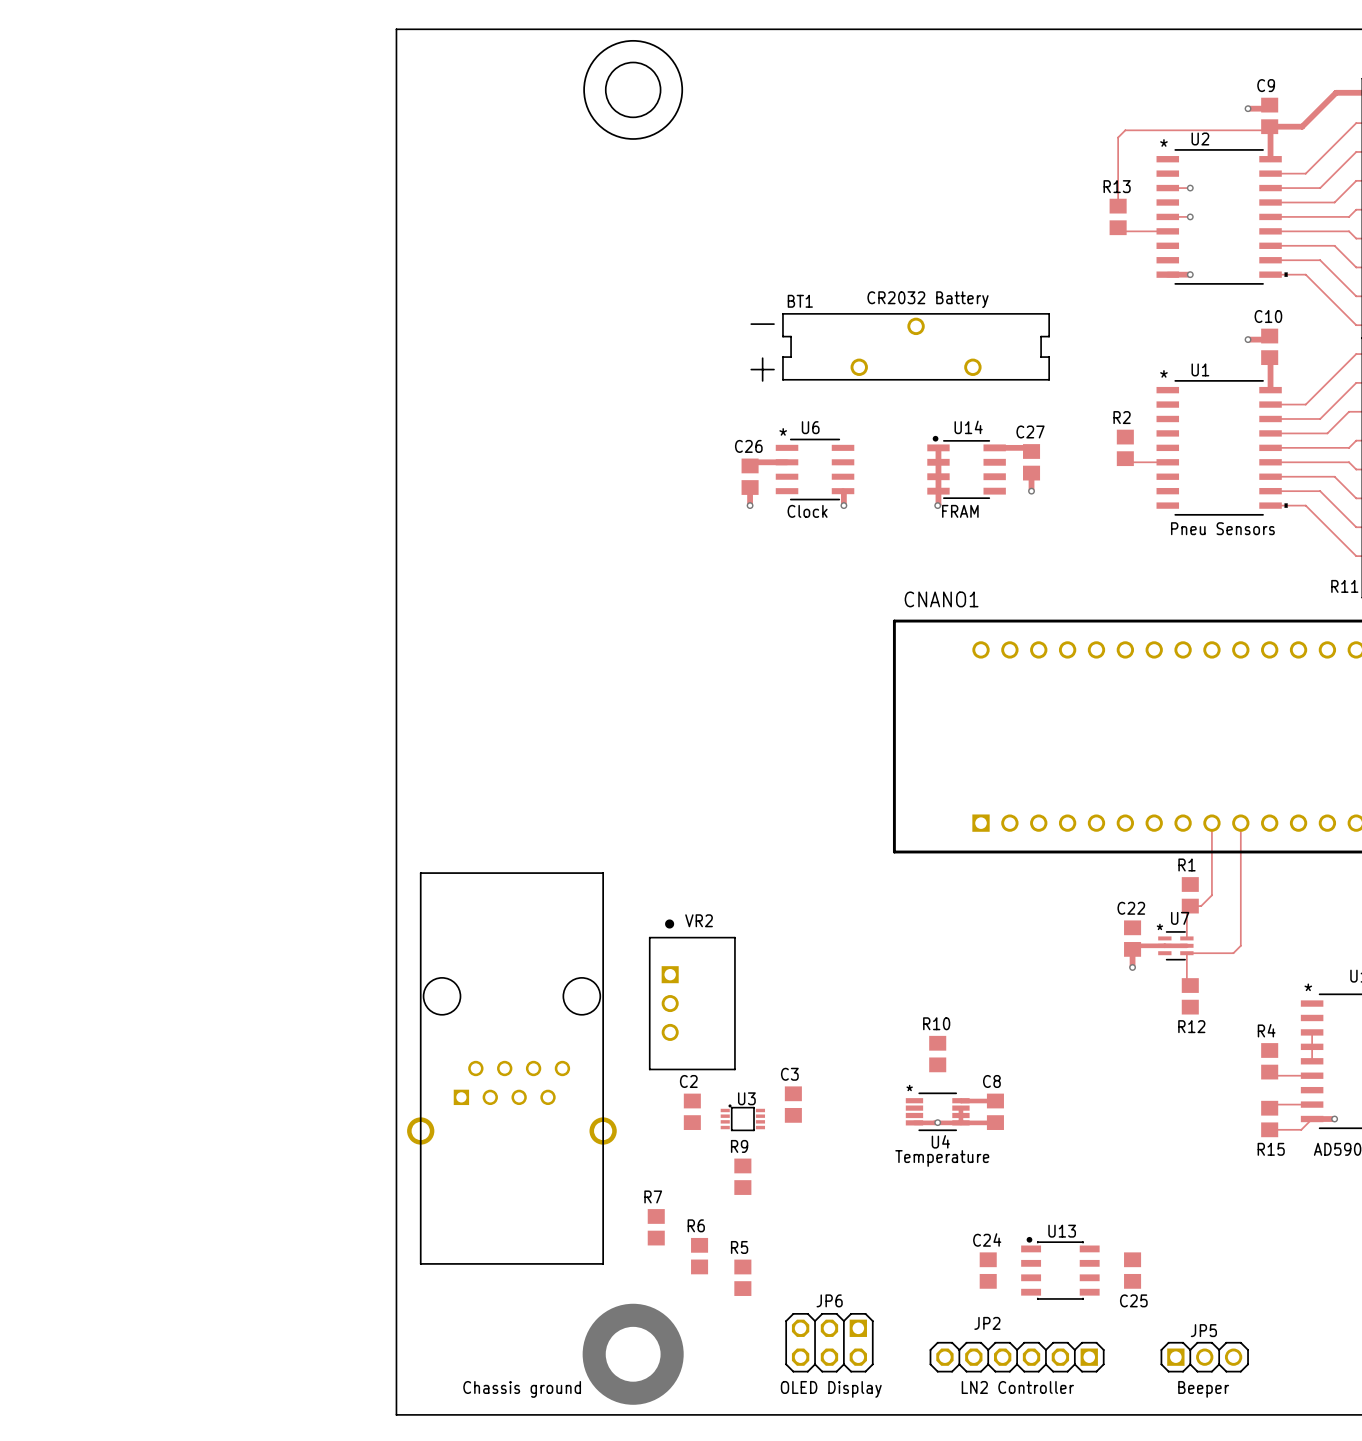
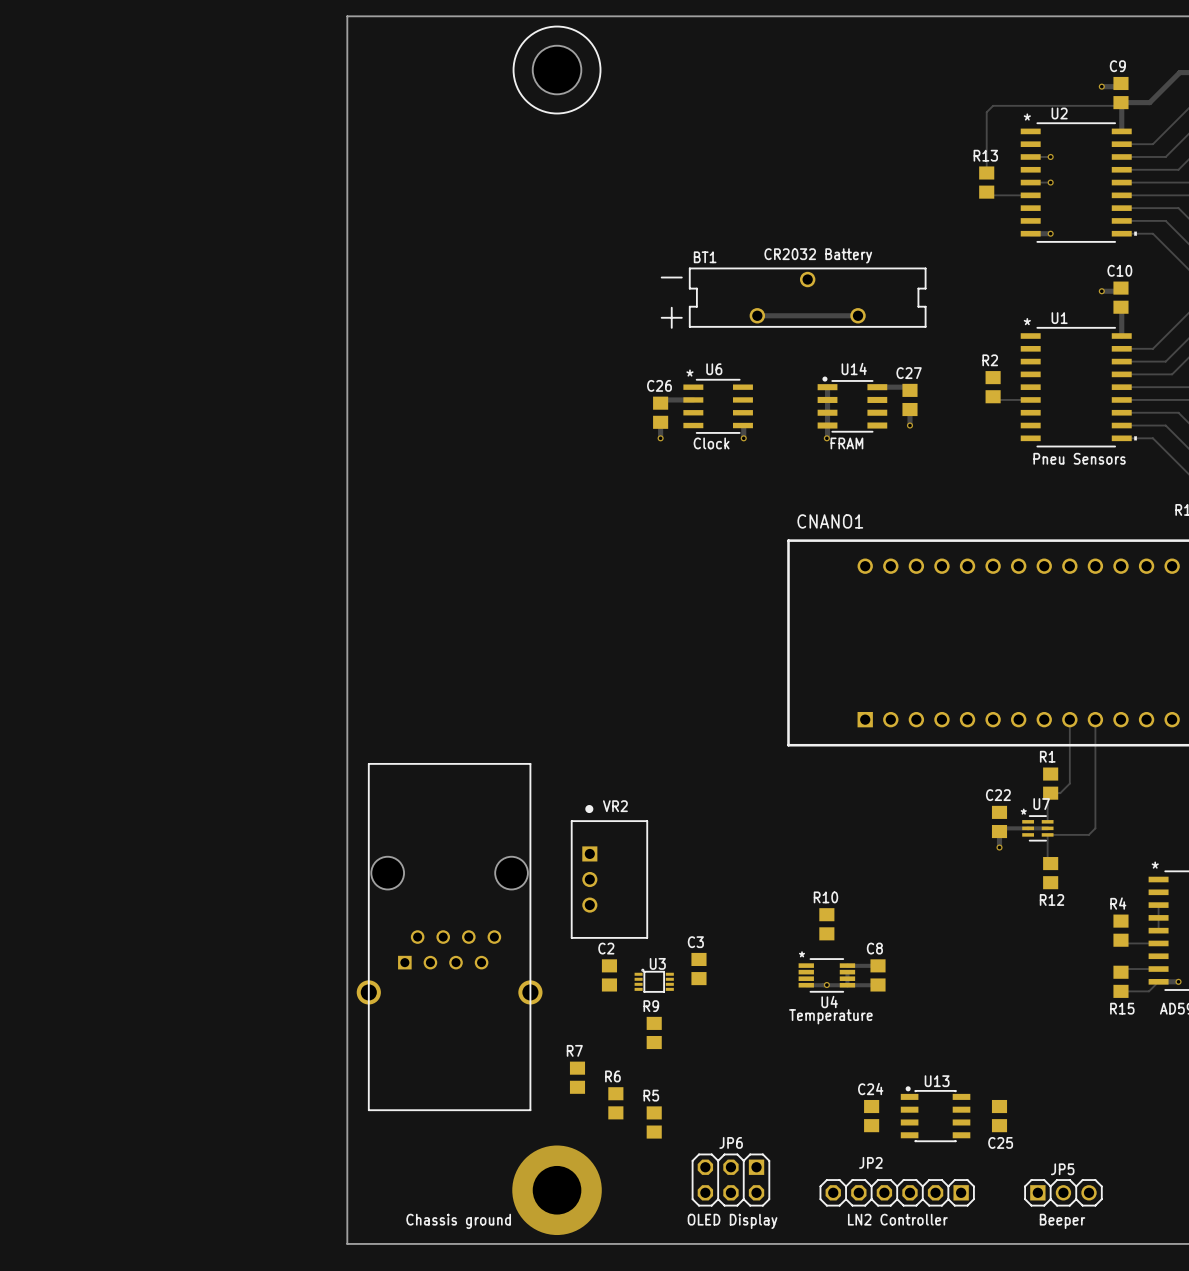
track: none -> (757, 315) (858, 315)

